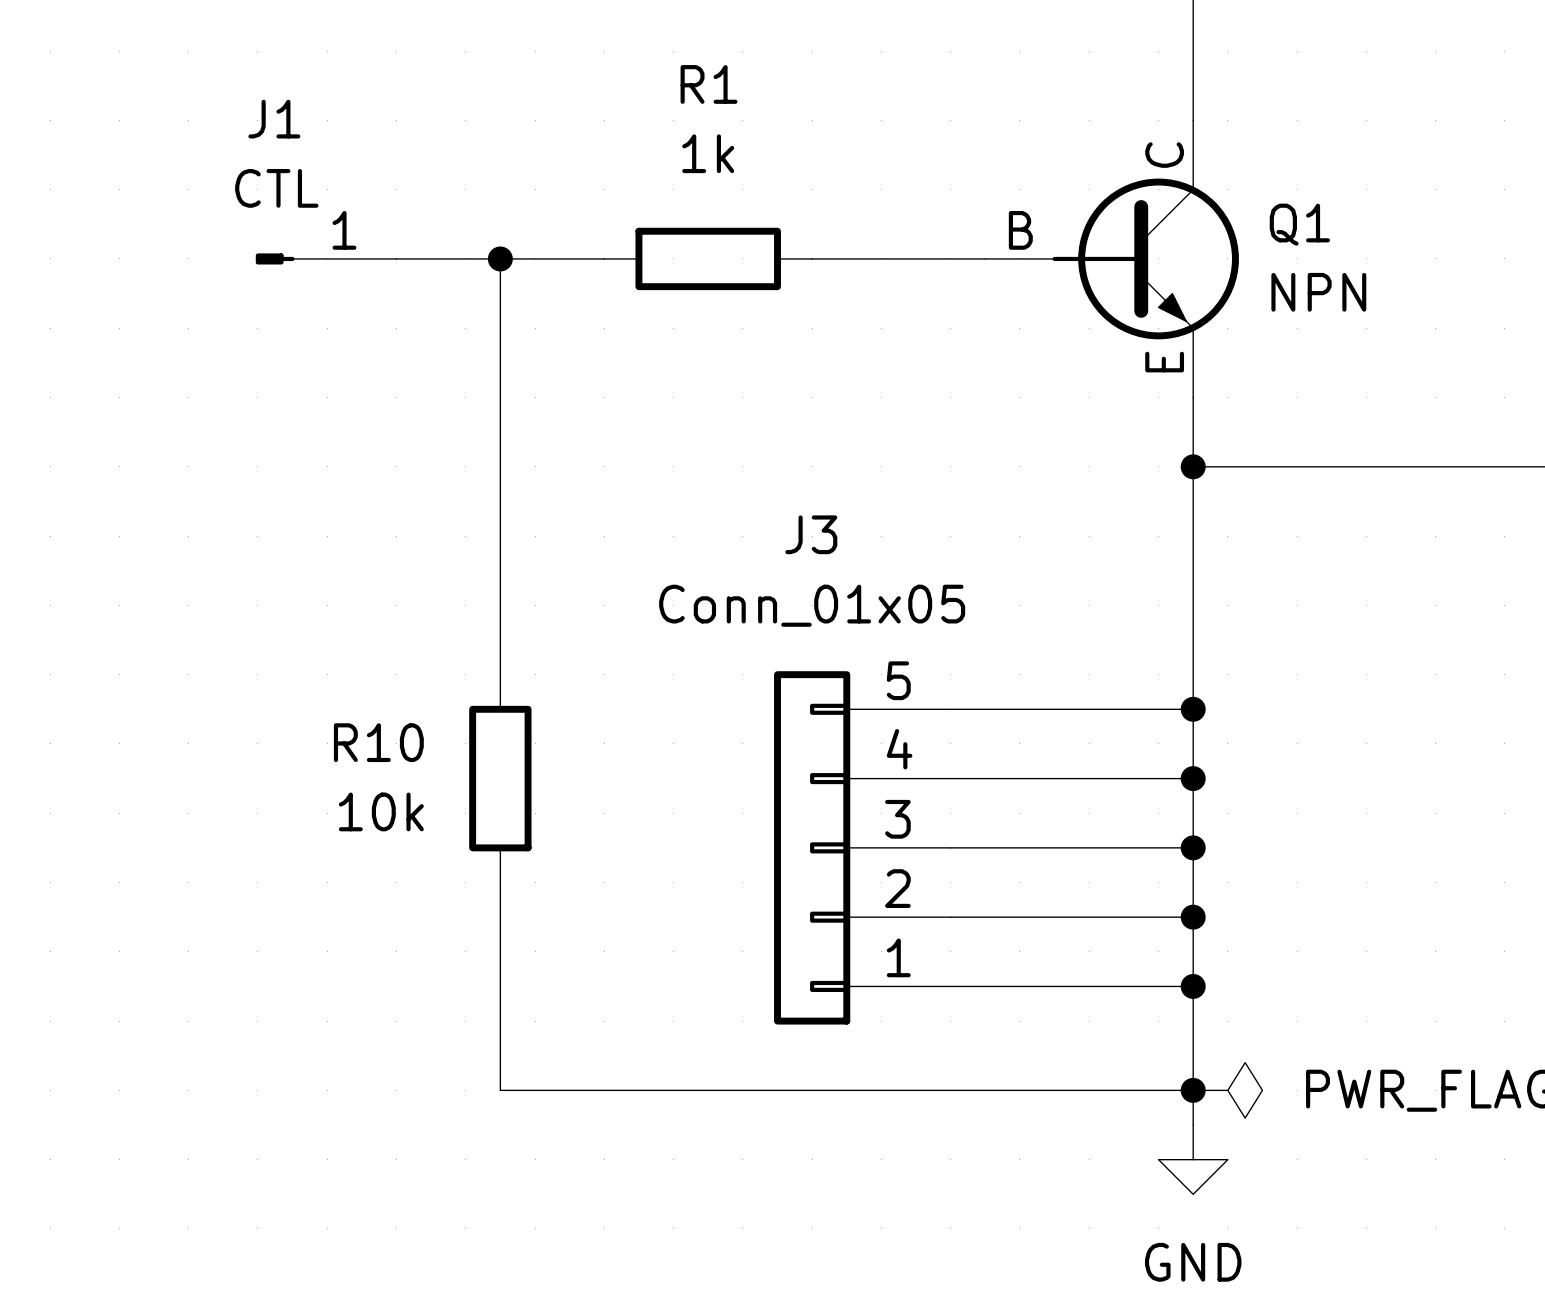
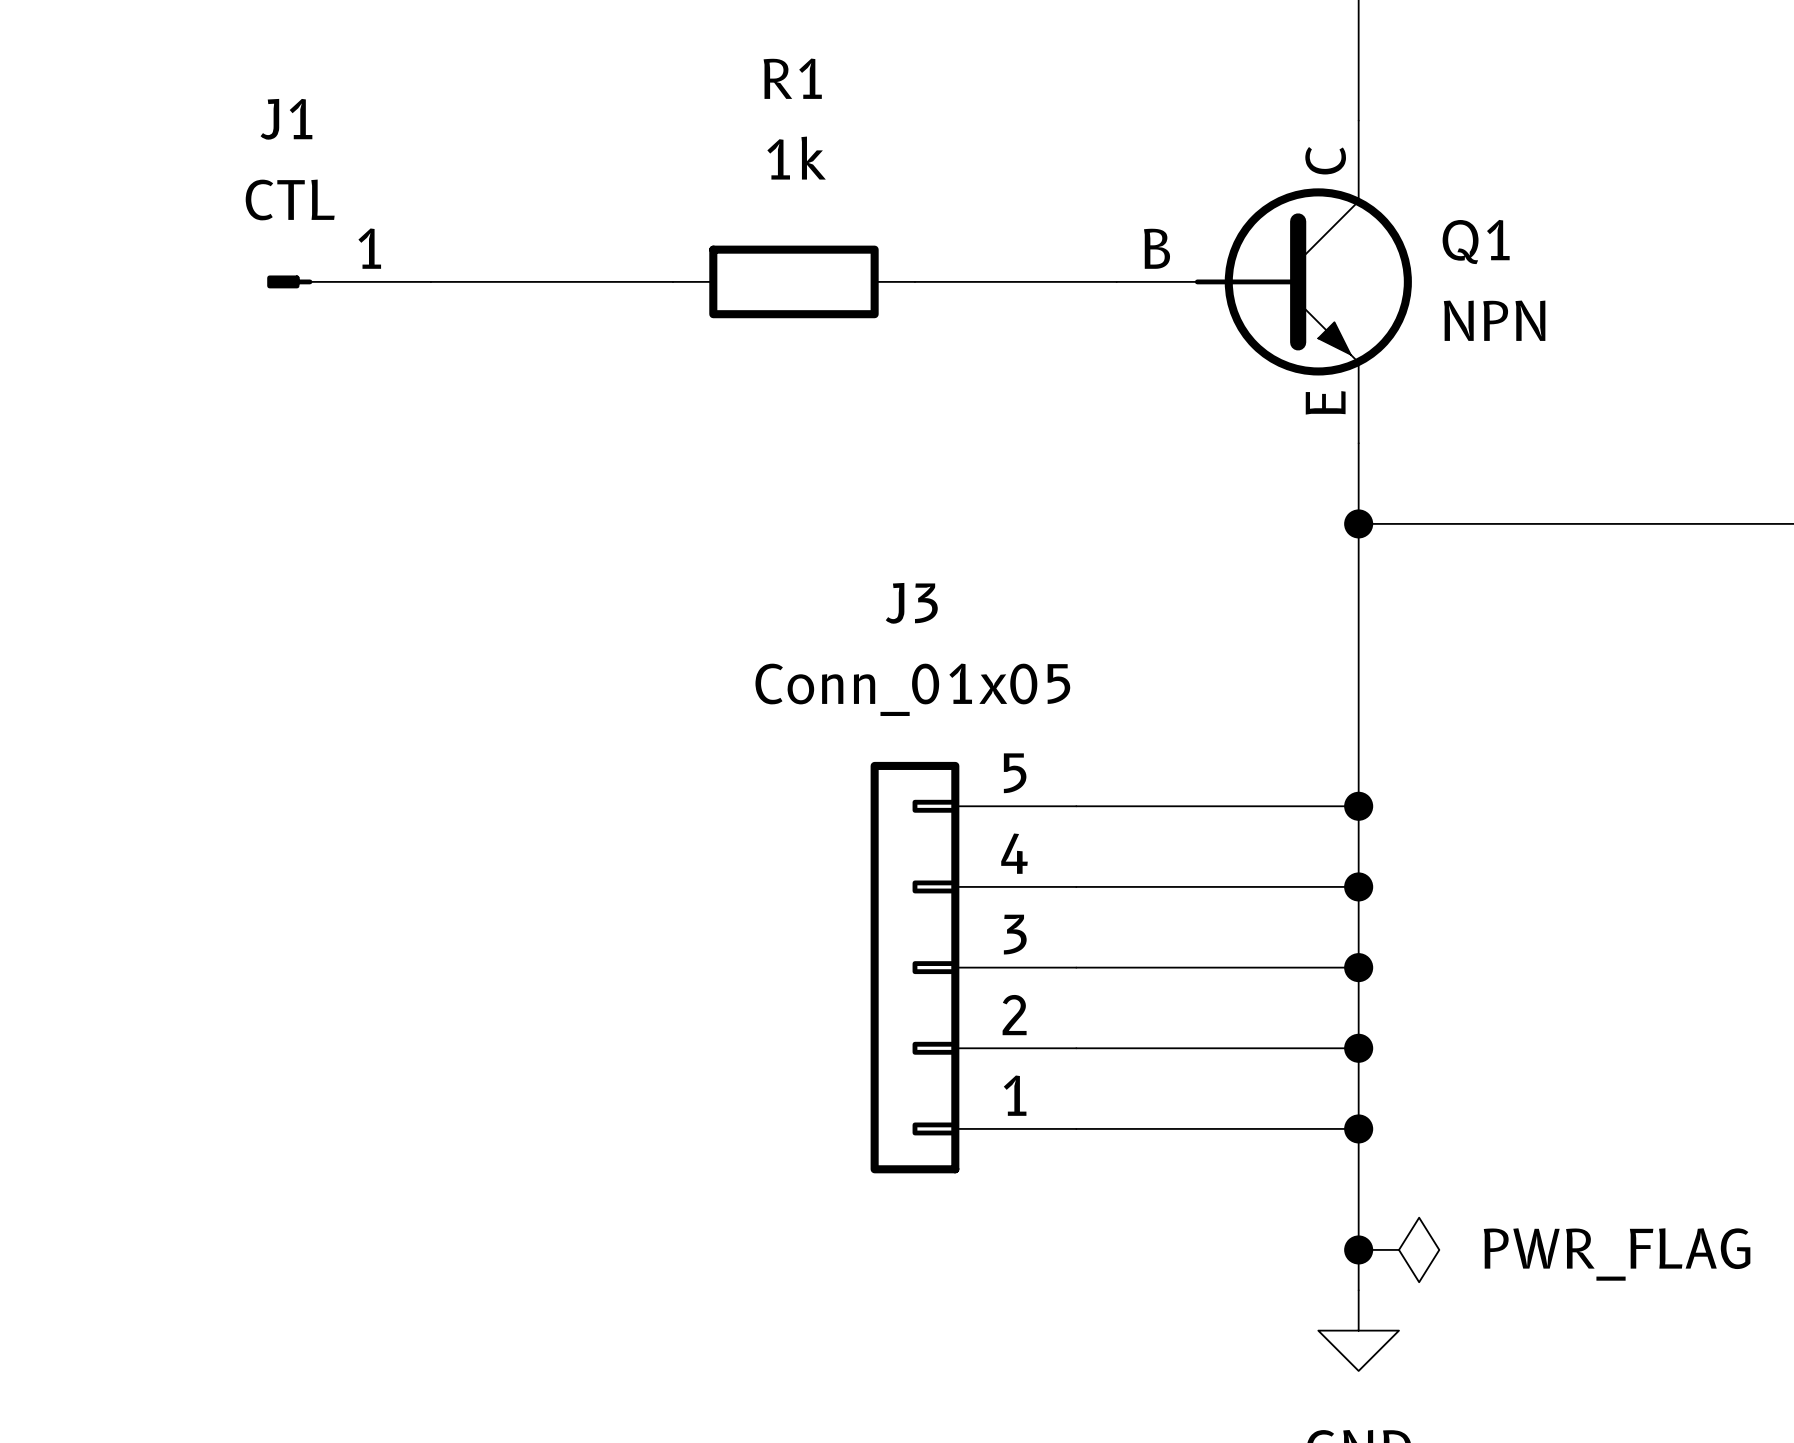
wire: (500, 258) (500, 674) -> none
junction: (500, 258) -> none
R10: 10k (500, 778) -> none
wire: (500, 882) (500, 1090) (1193, 1090) -> none

